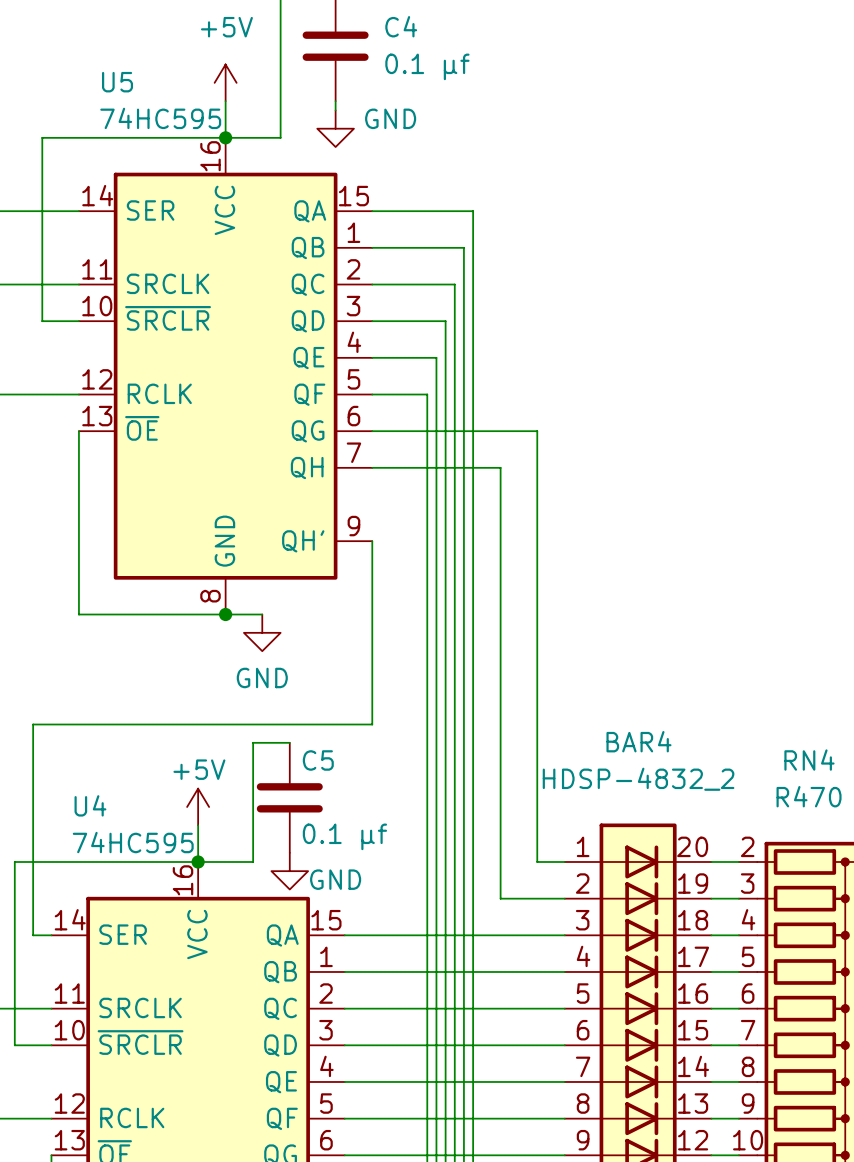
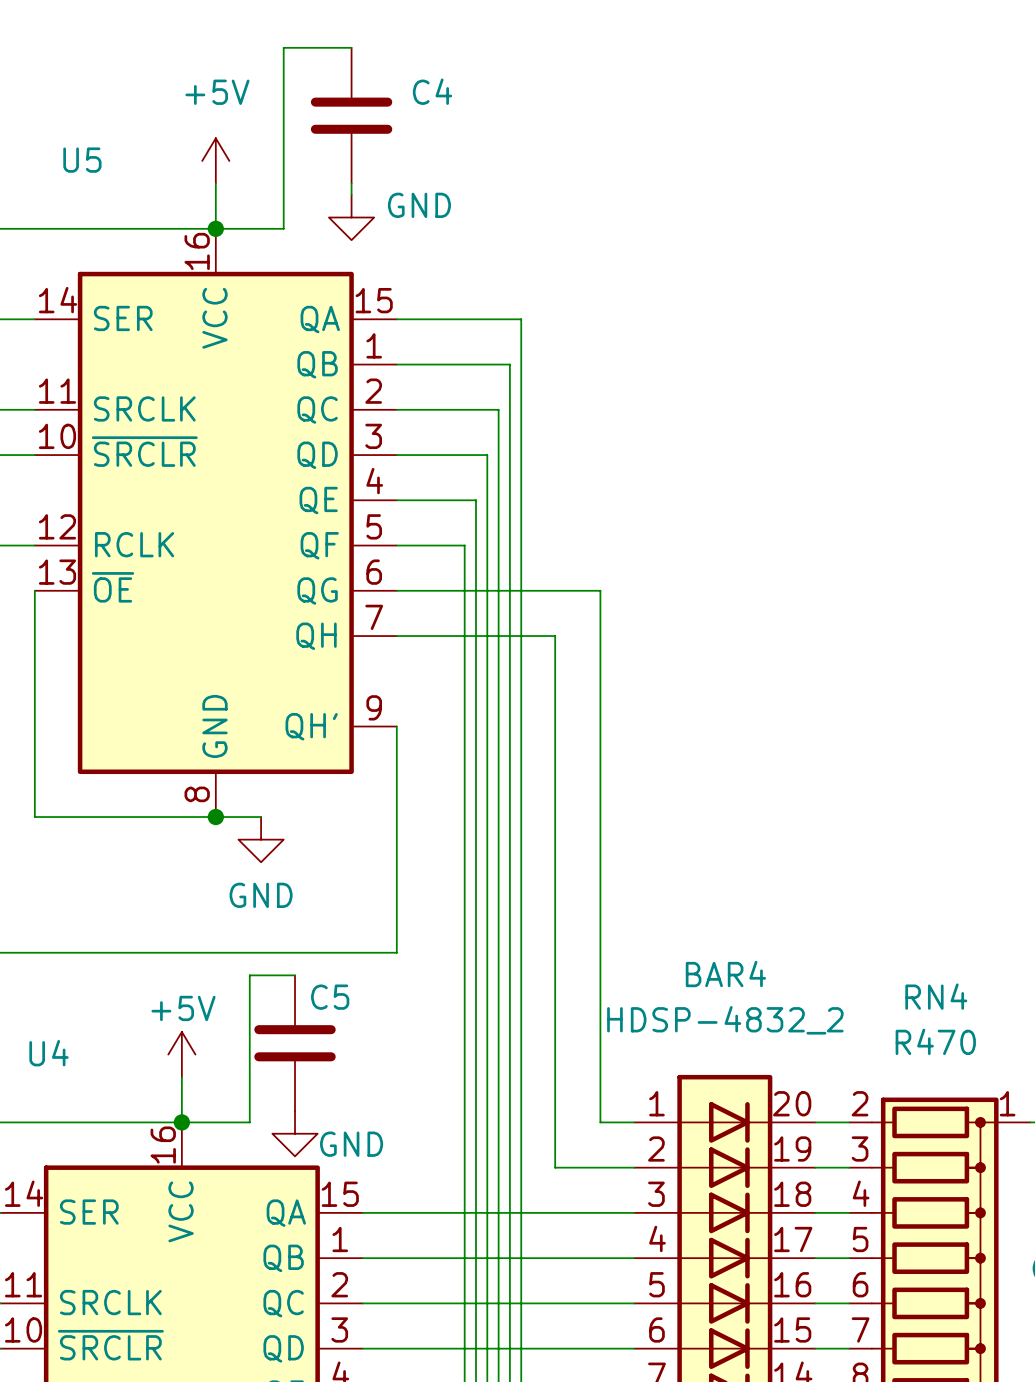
C4 value: 0.1 µf (427, 66) -> none
U5 value: 74HC595 (160, 118) -> none
C5 value: 0.1 µf (344, 836) -> none
U4 value: 74HC595 (133, 842) -> none

